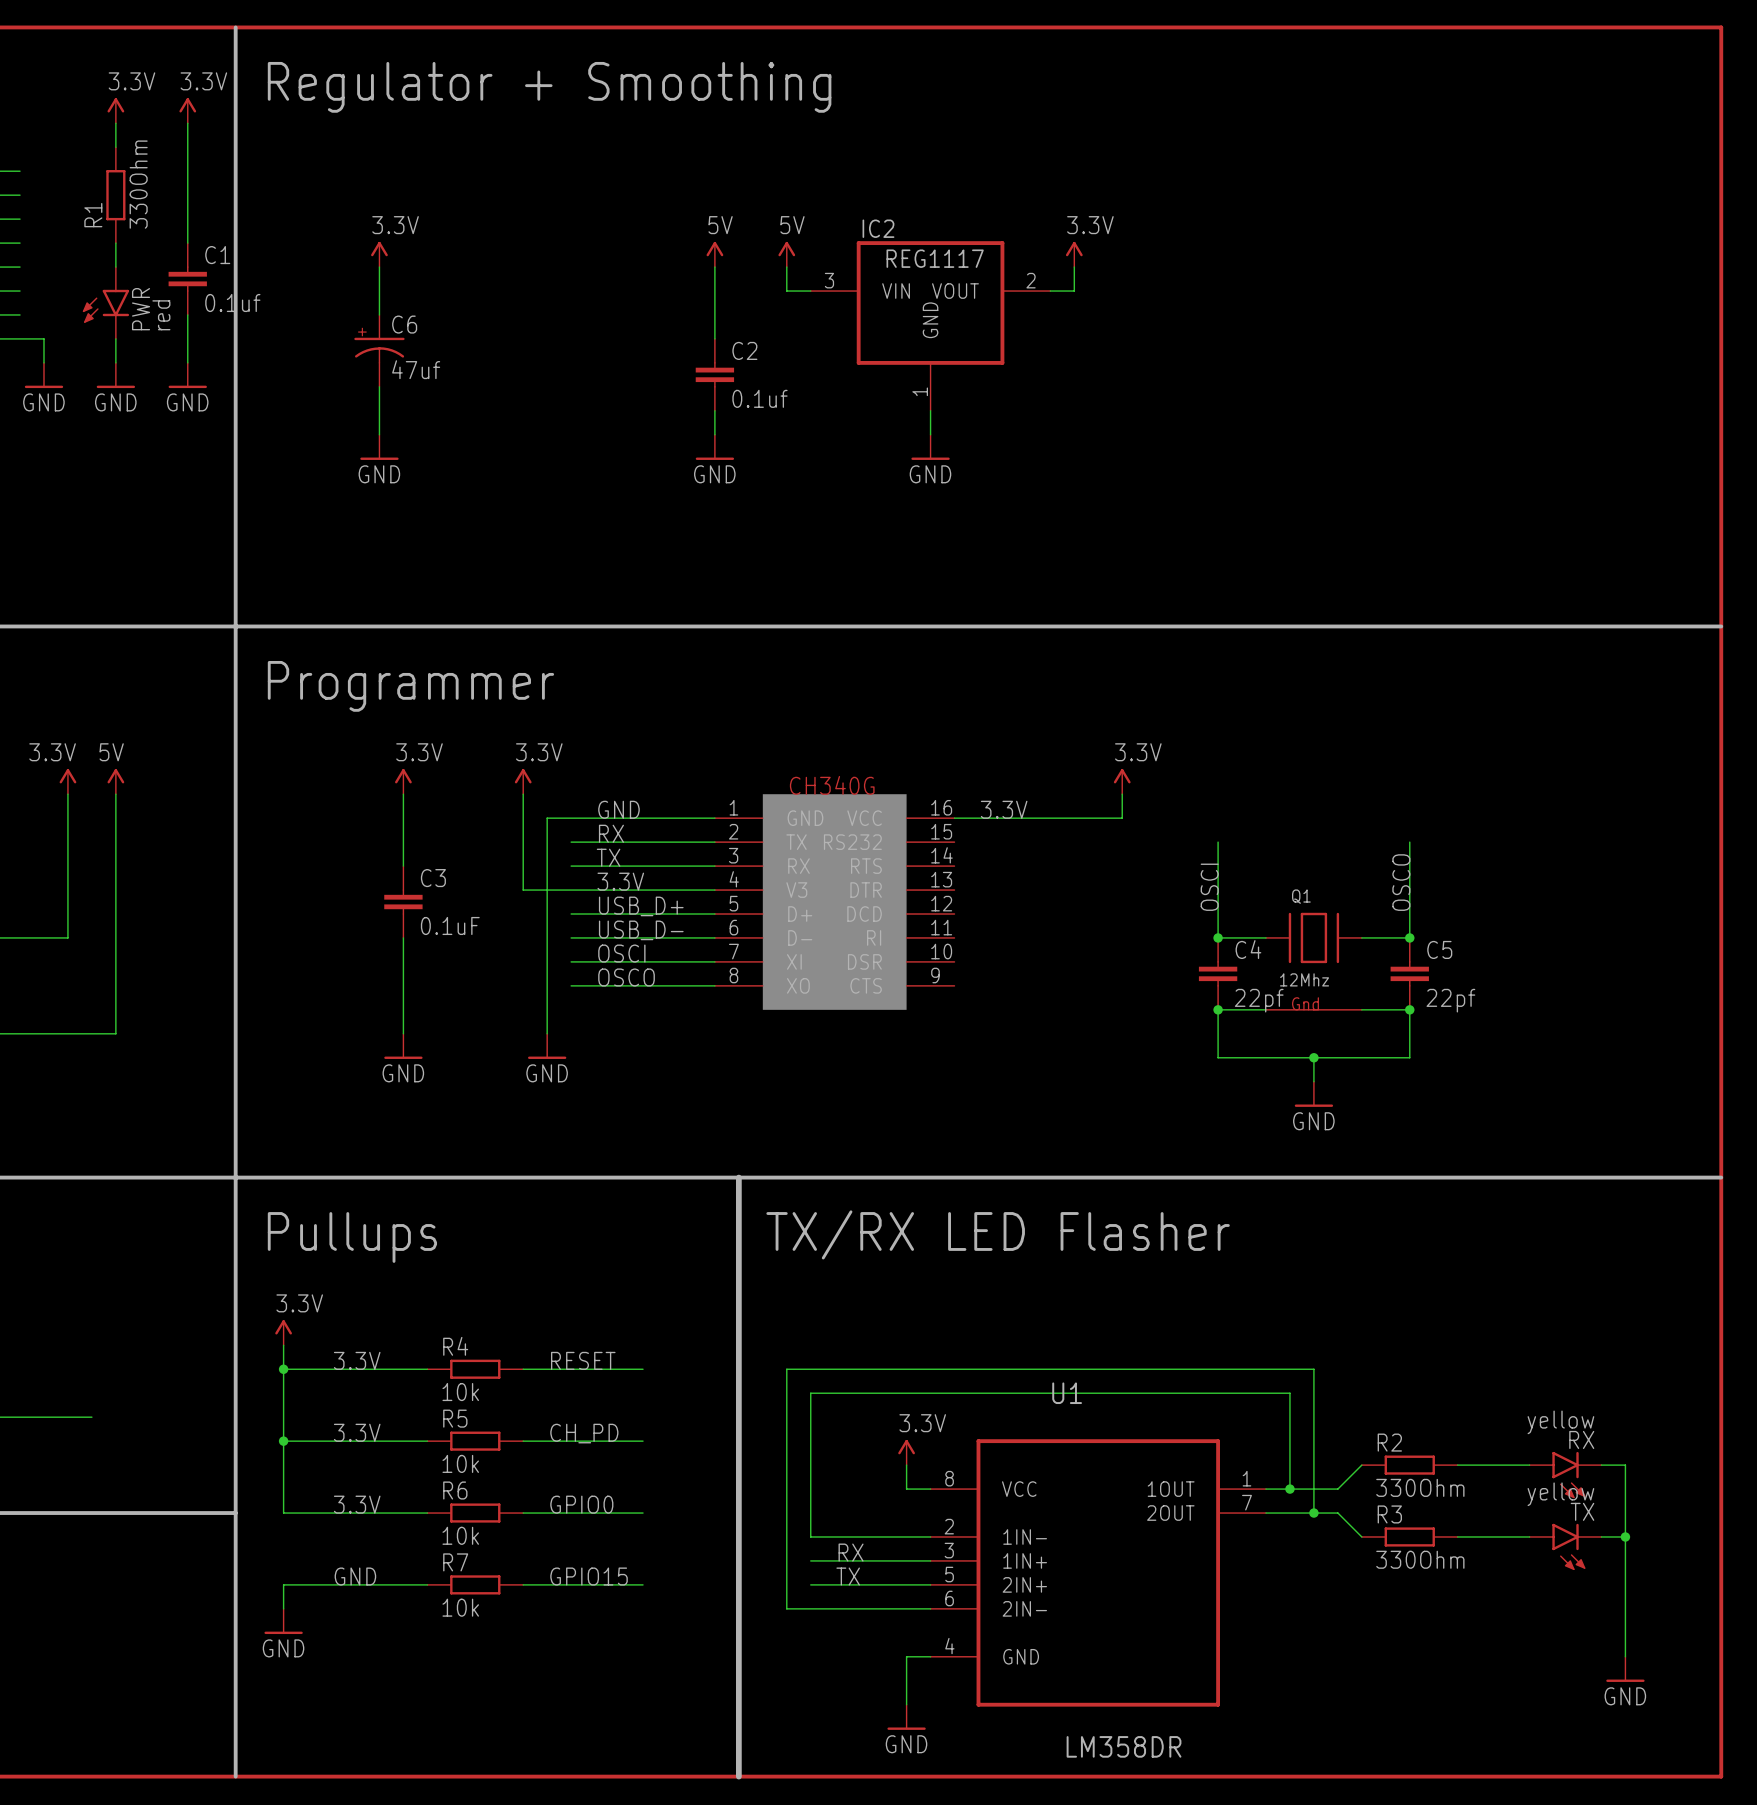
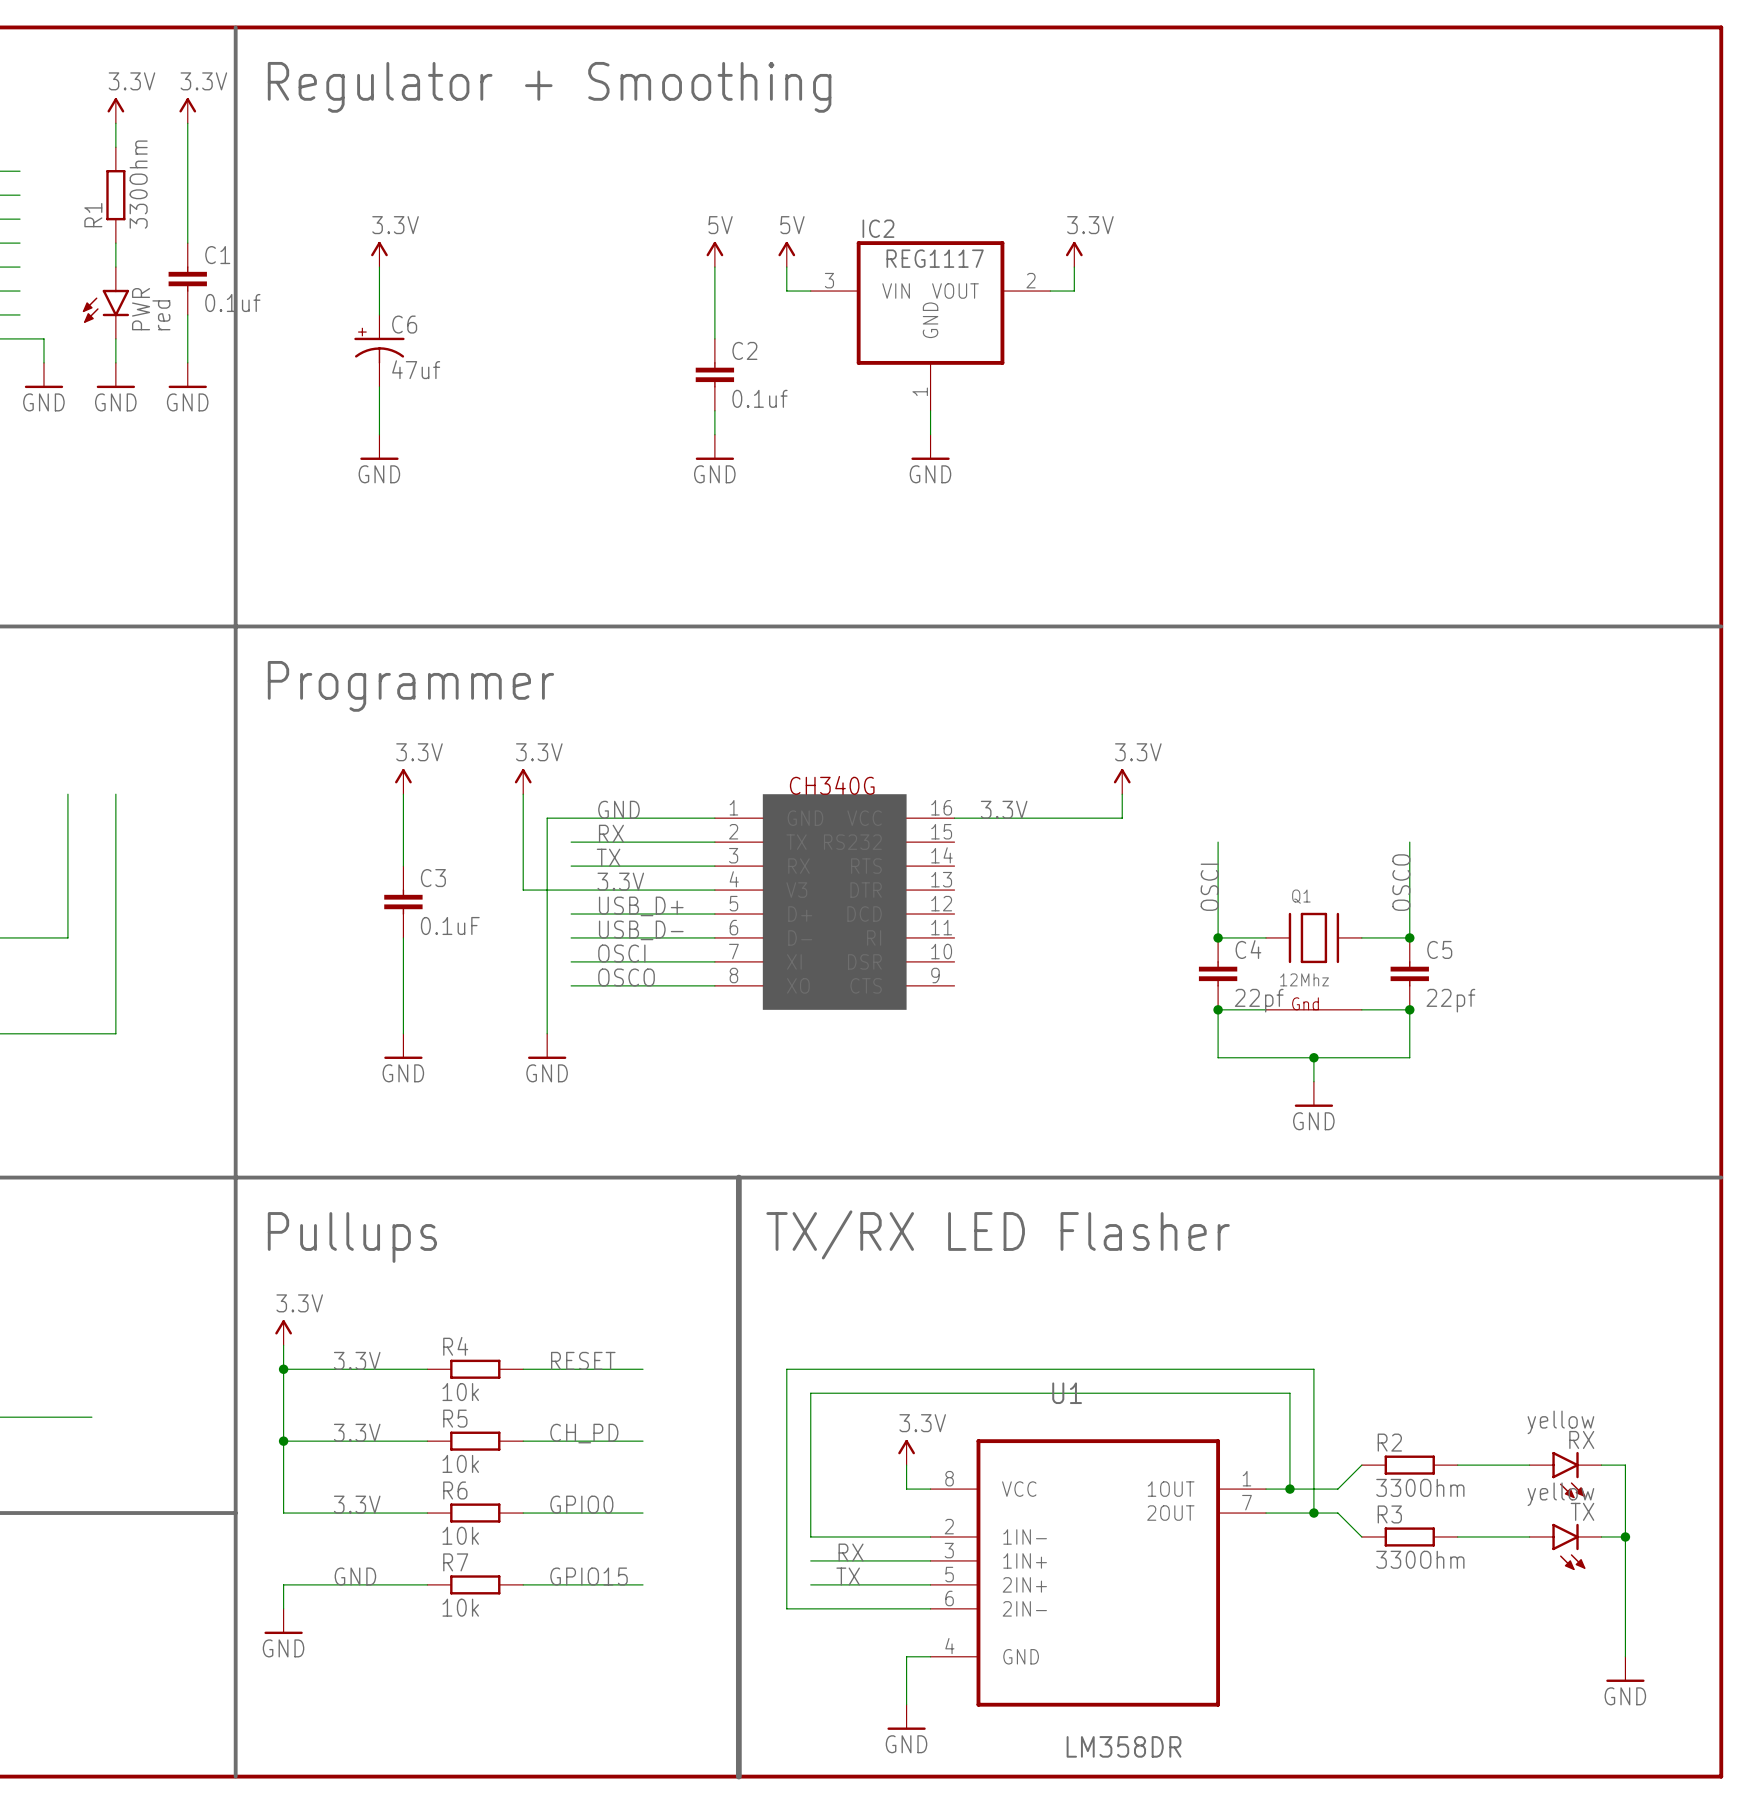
power symbol: 3.3V (67, 781) -> none
power symbol: 5V (115, 781) -> none

